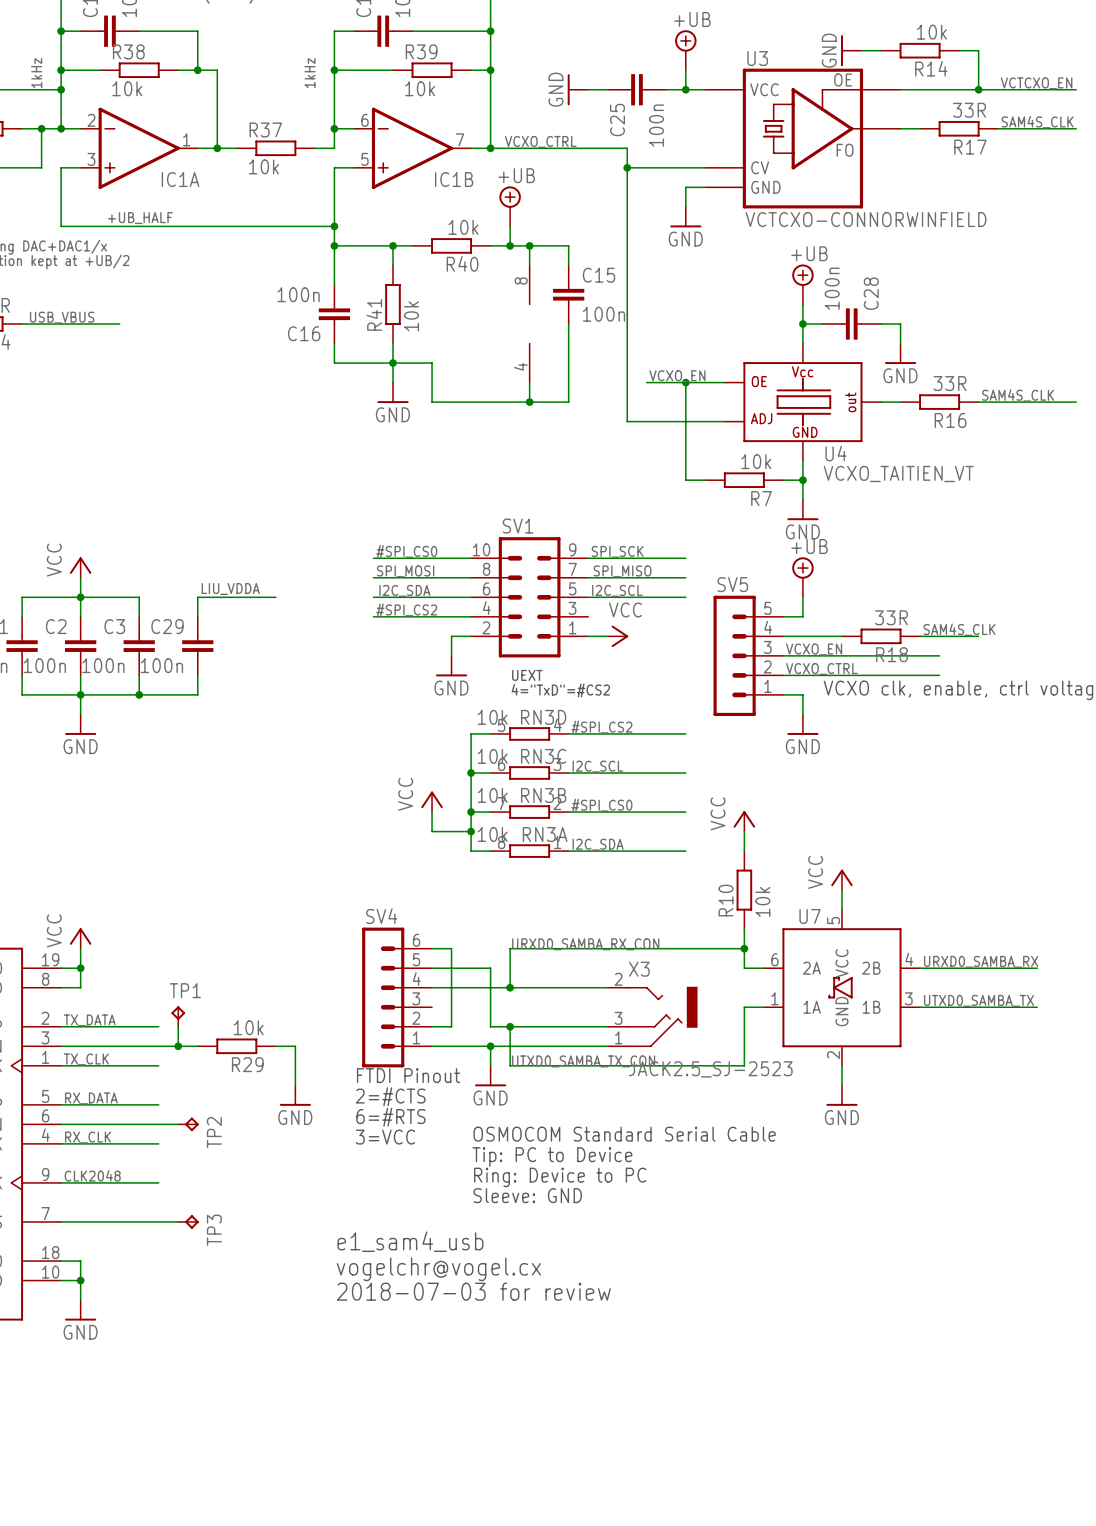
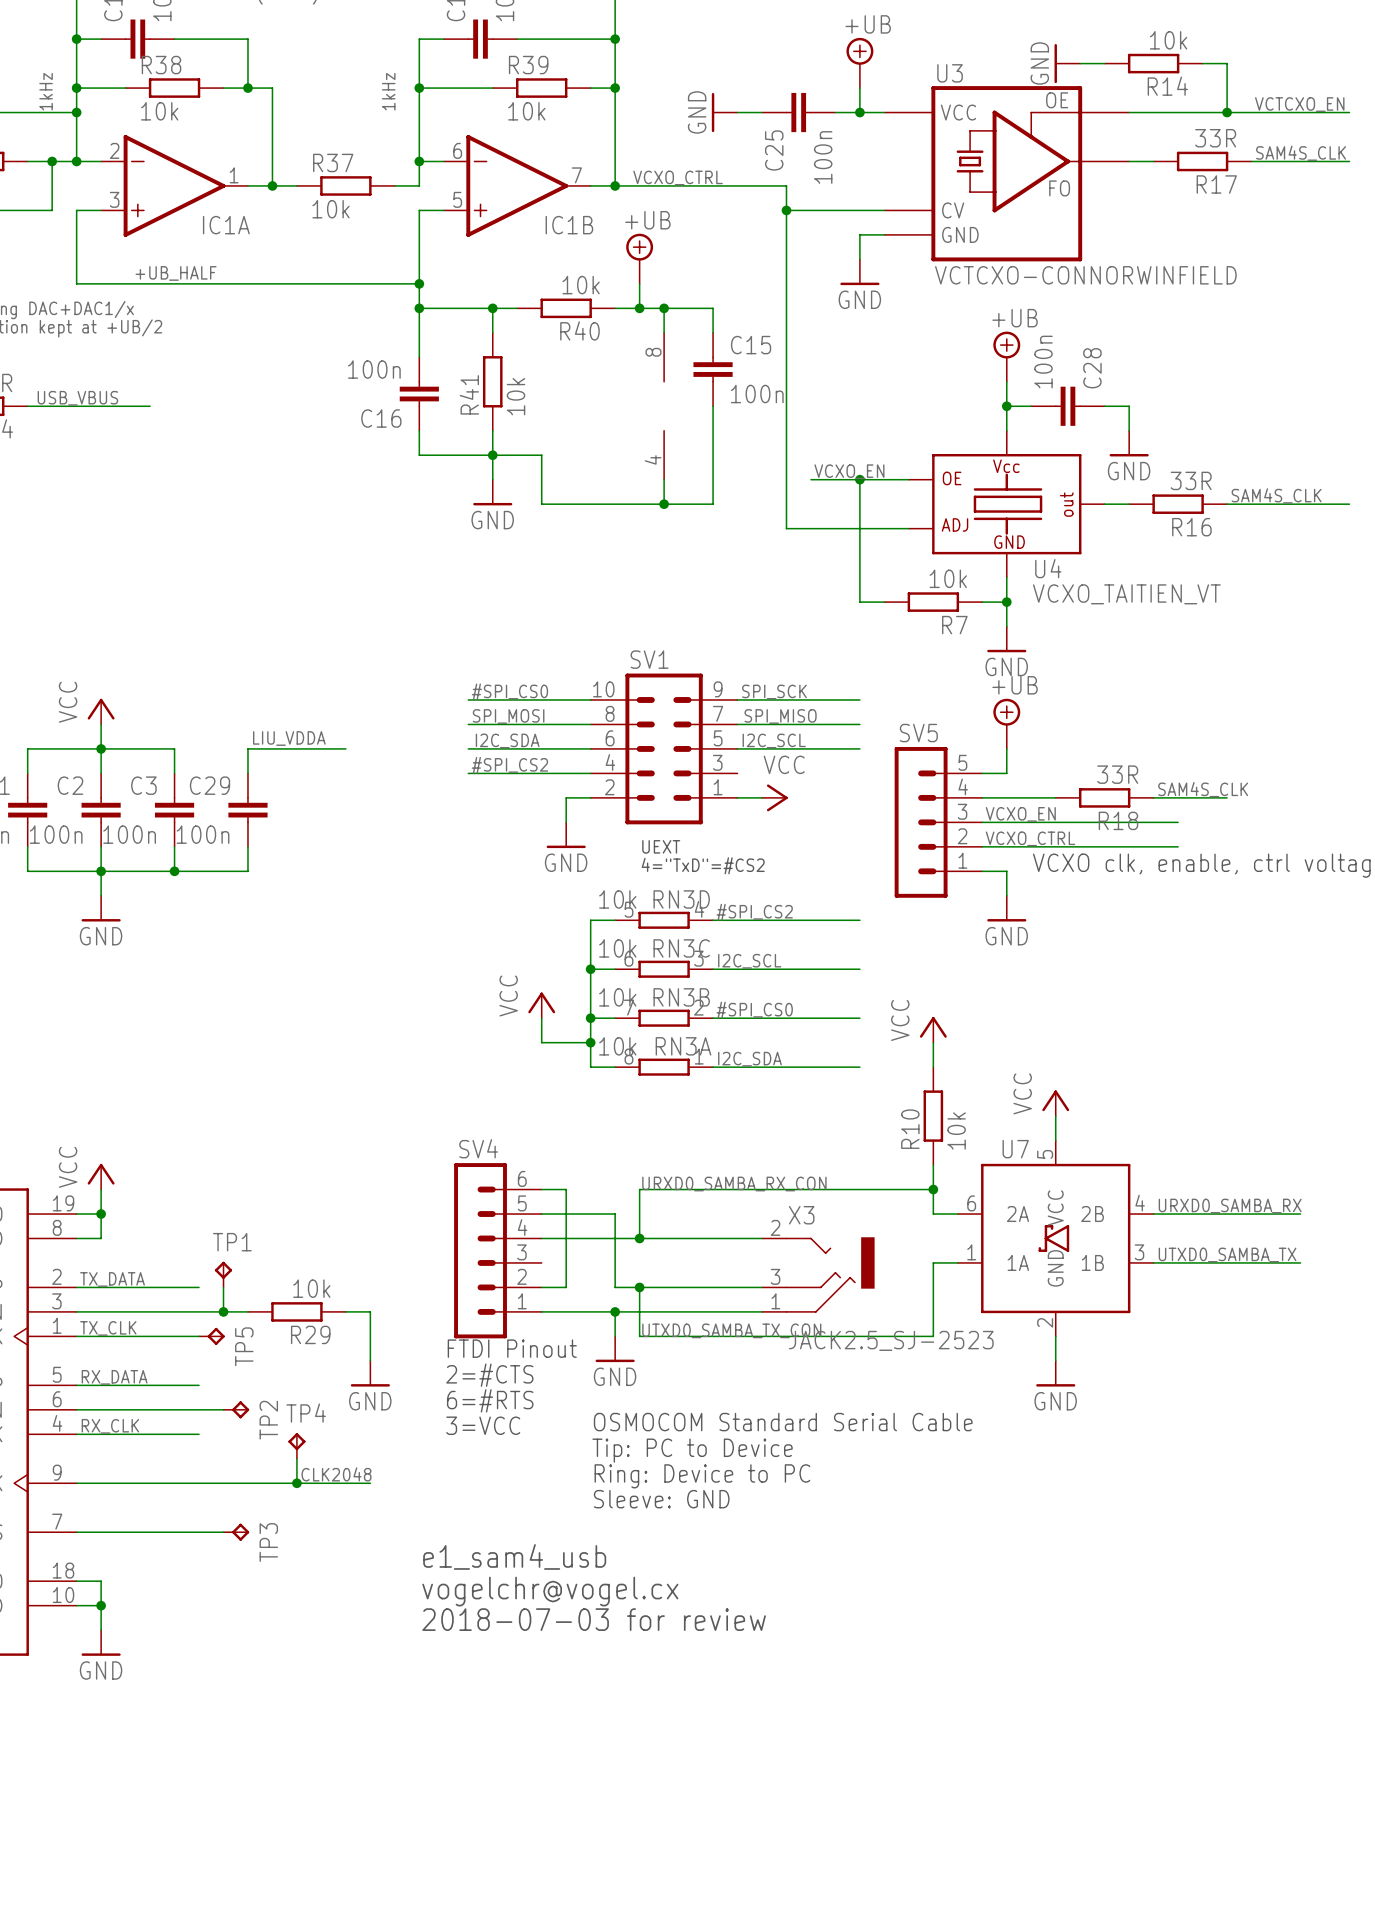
TP5: none -> (211, 1336)
TP4: none -> (296, 1445)
wire: none -> (296, 1458) (296, 1483)
label position: CLK2048 (92, 1175) -> CLK2048 (336, 1474)
wire: none -> (199, 1483) (370, 1483)
junction: none -> (296, 1483)

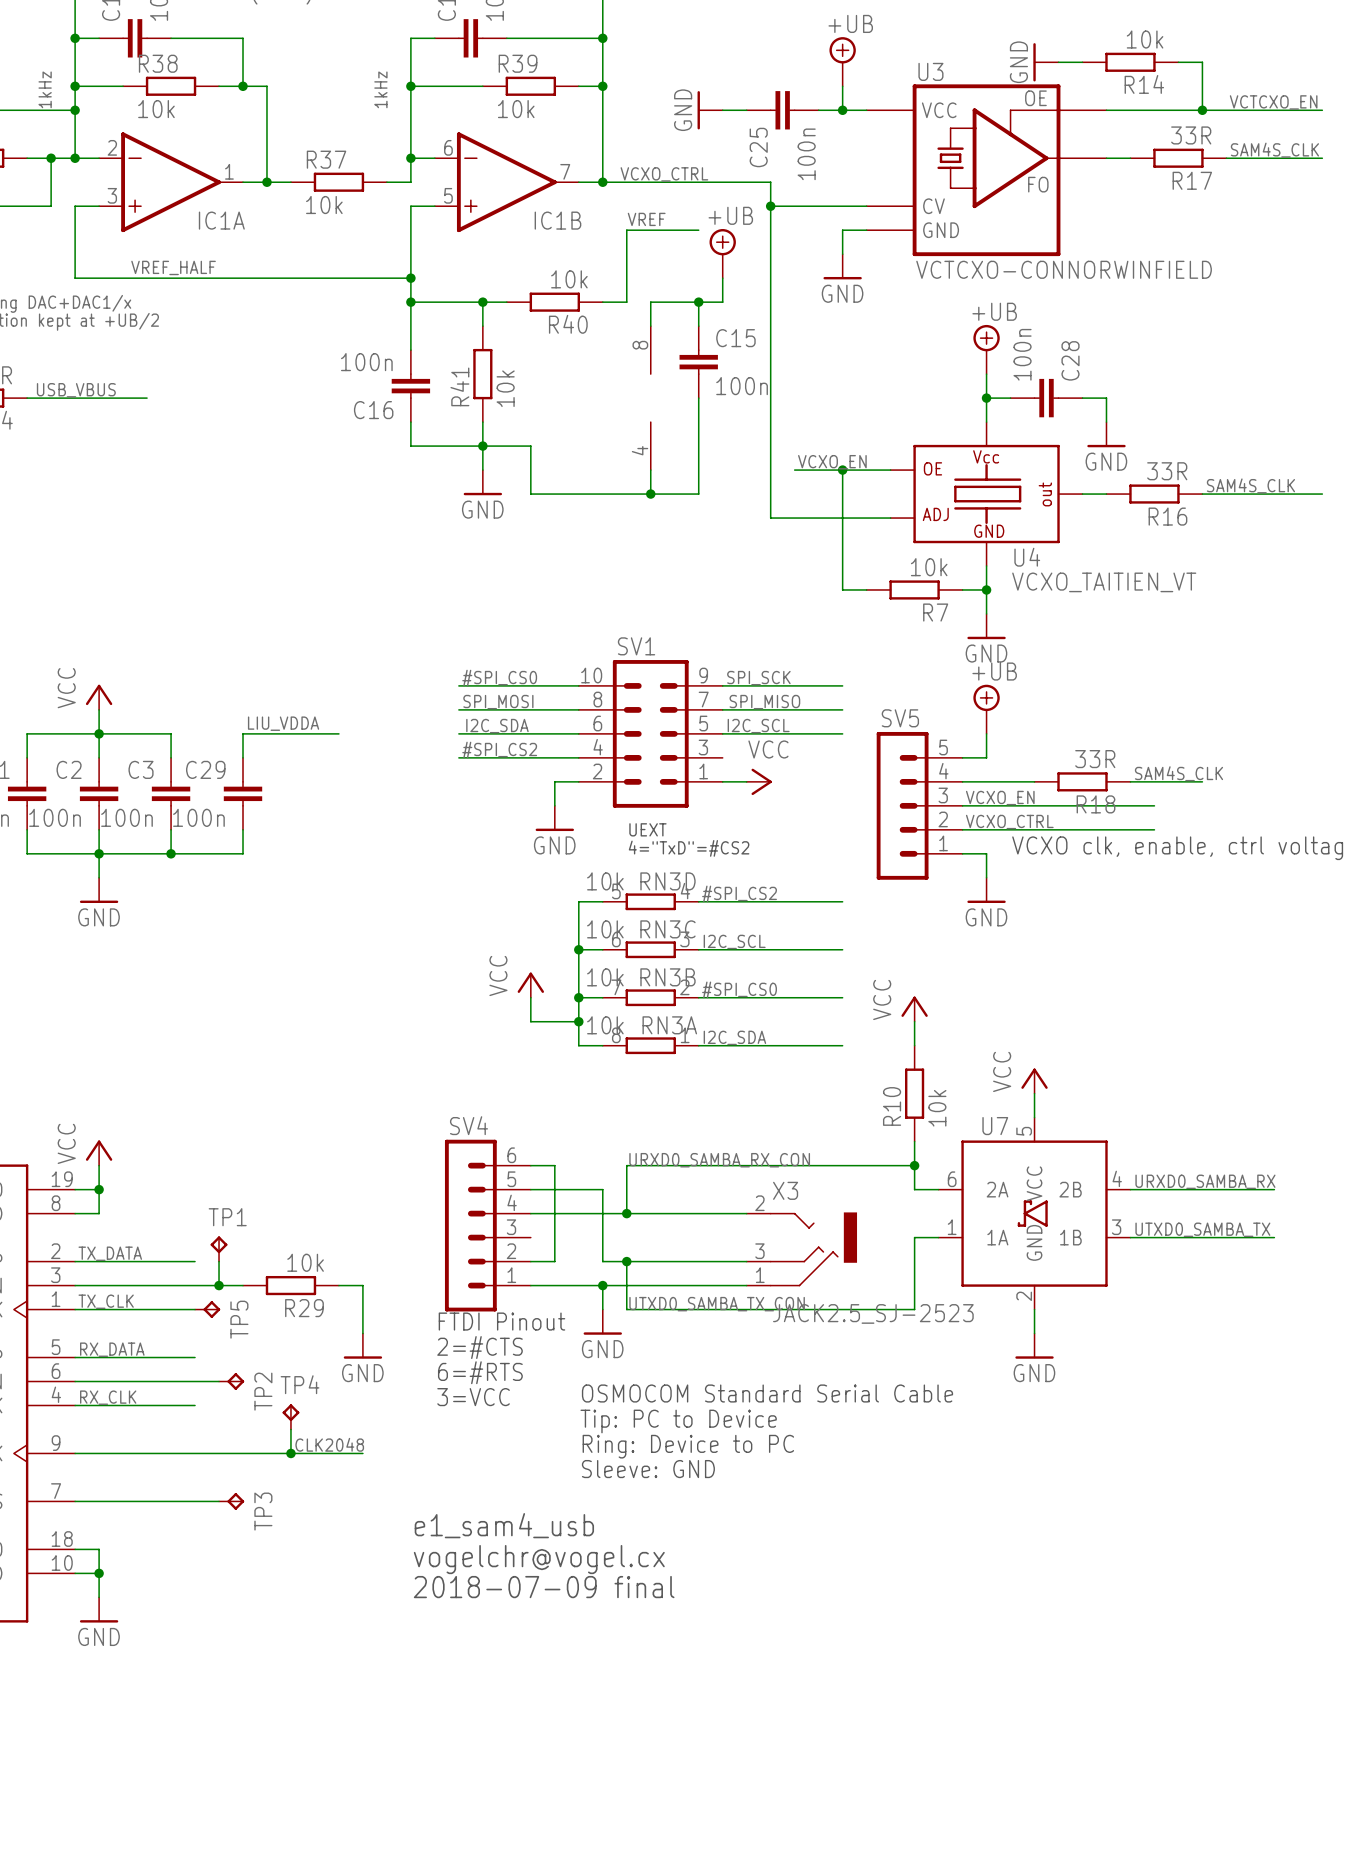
label: none -> VREF (646, 219)
wire: none -> (698, 230) (626, 230) (626, 278)
power symbol position: +UB (639, 258) -> +UB (722, 253)
label: +UB_HALF (176, 273) -> VREF_HALF (173, 267)
wire: none -> (722, 278) (722, 302) (698, 302)
wire: (639, 308) (664, 308) -> none
junction: (639, 308) -> none
junction: (664, 308) -> none
junction: none -> (698, 302)
text: 2018-07-03 for review (594, 1619) -> 2018-07-09 final (544, 1587)

